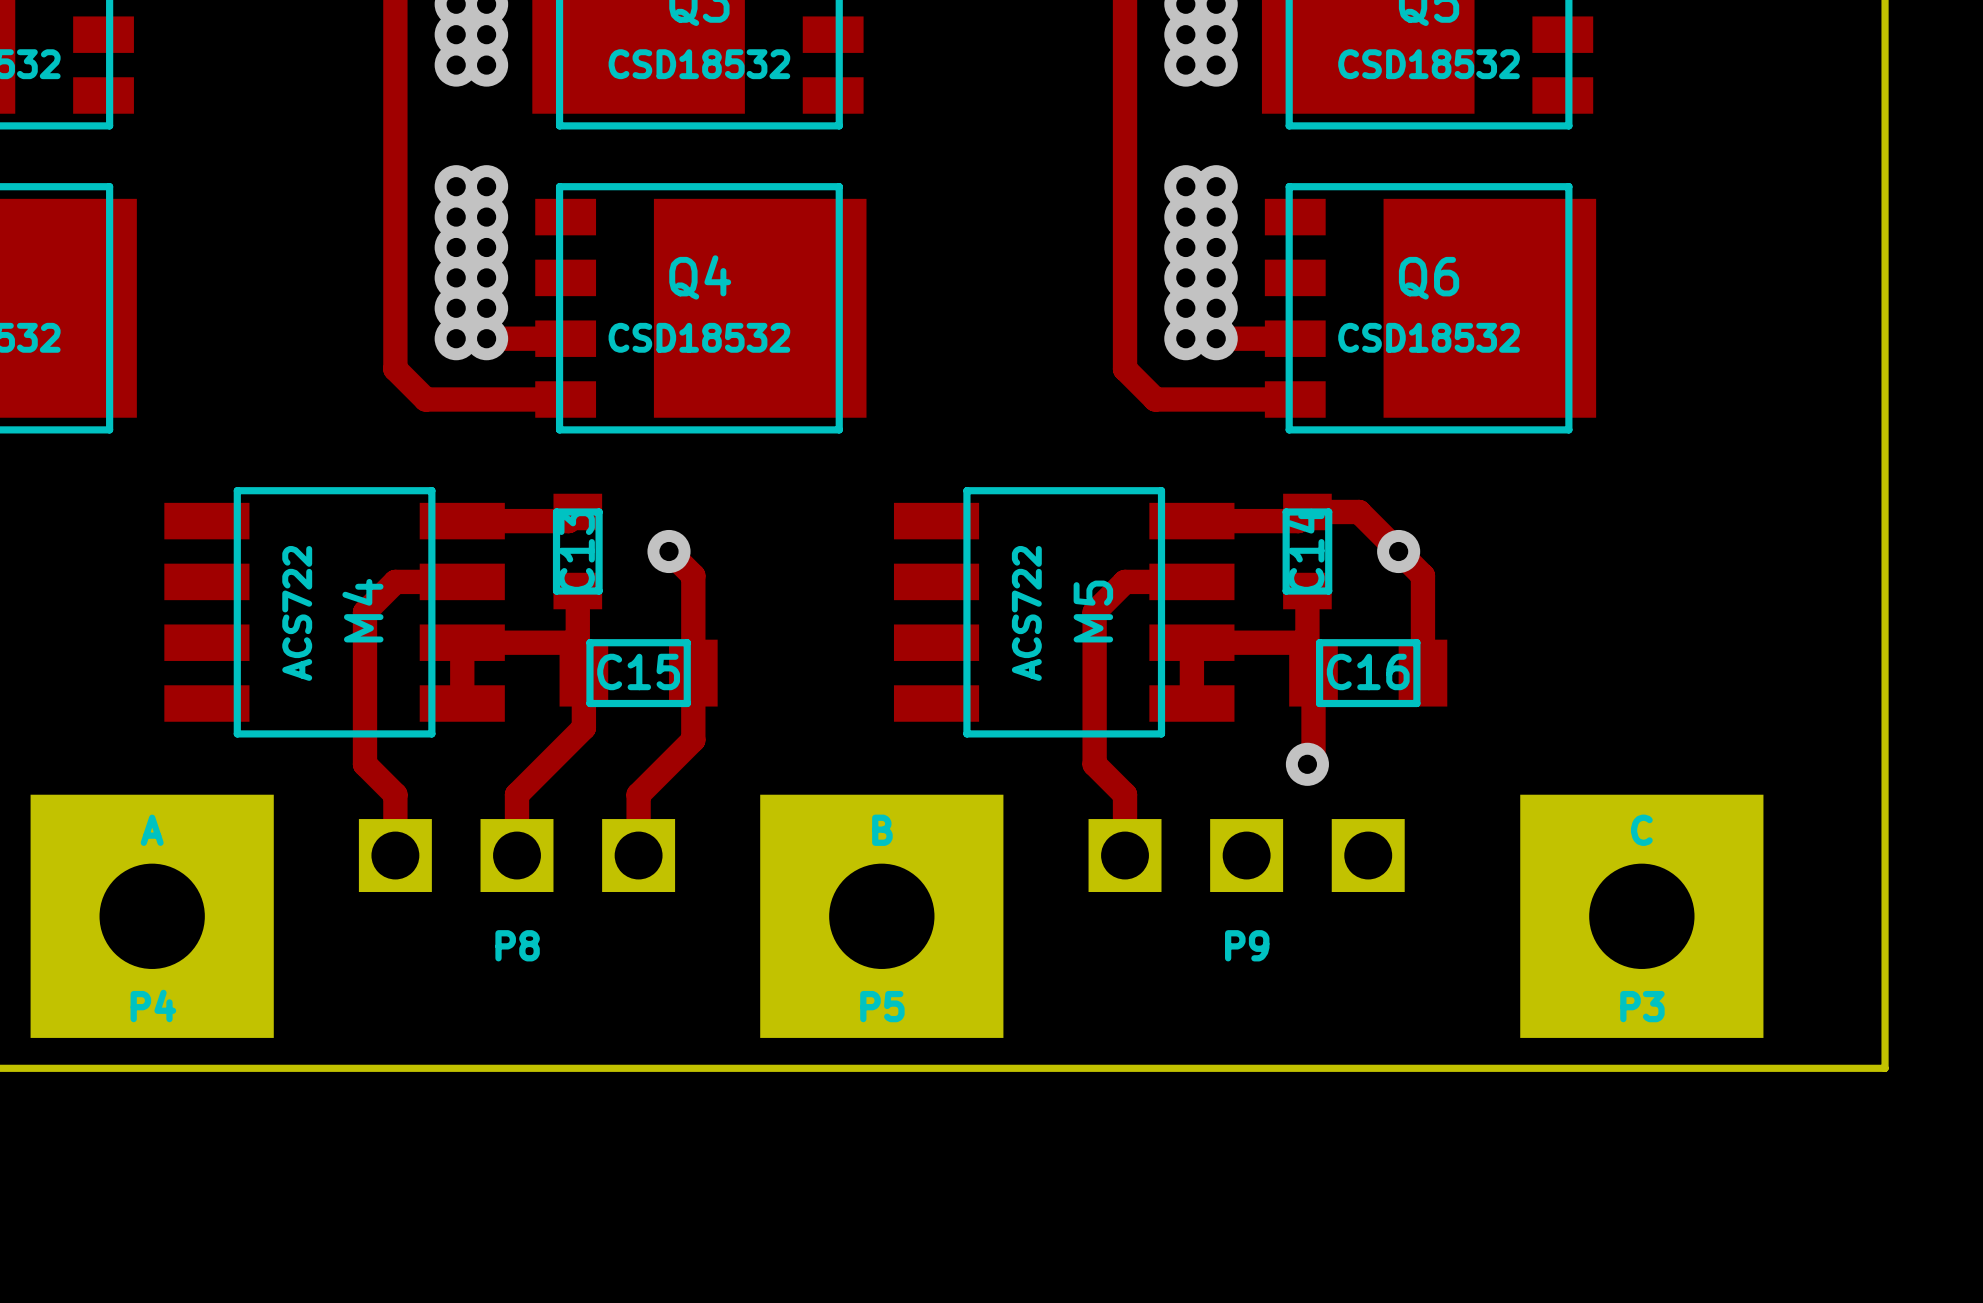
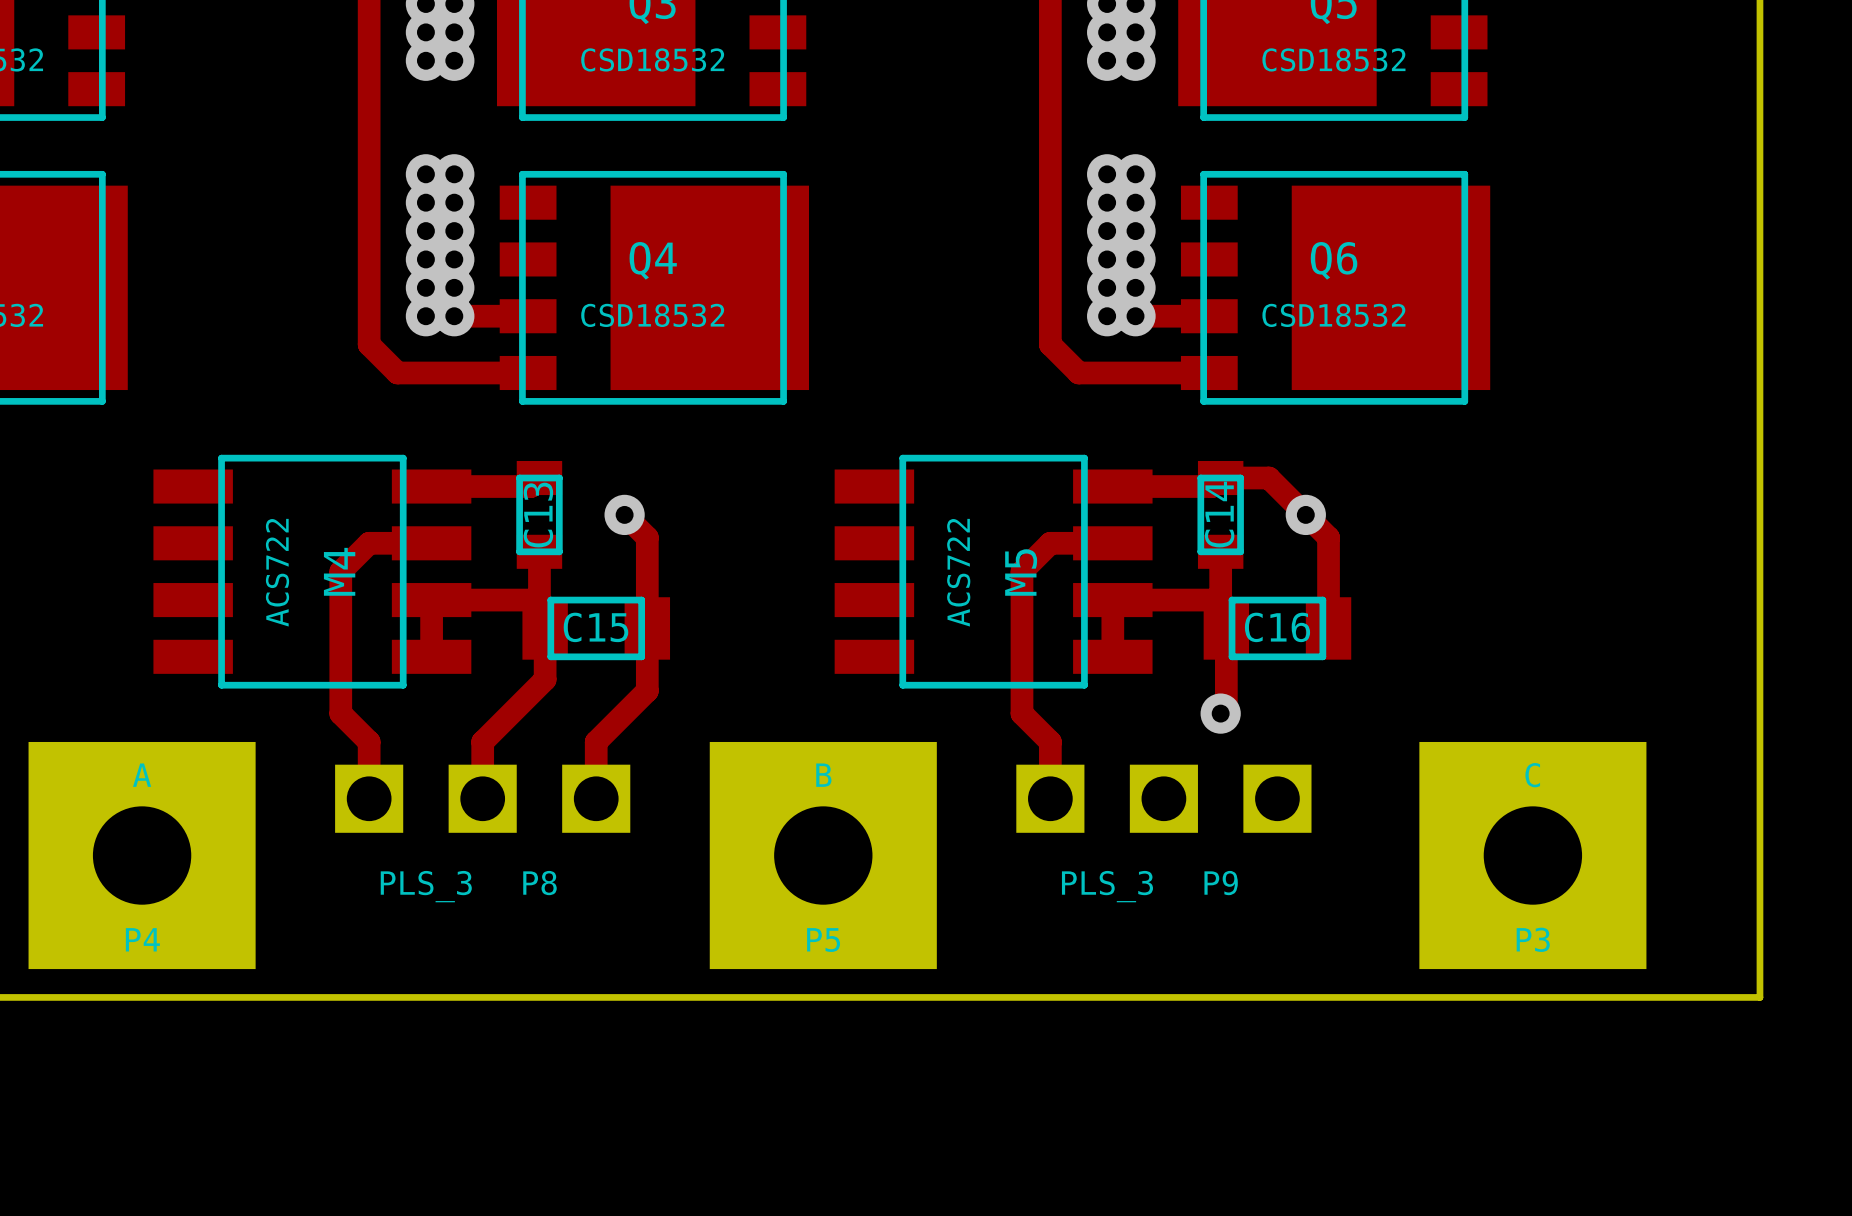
P8 name position: P8 (517, 945) -> P8 (539, 883)
P9 name position: P9 (1247, 945) -> P9 (1221, 883)
P8 value: none -> PLS_3 (426, 886)
P9 value: none -> PLS_3 (1107, 886)

